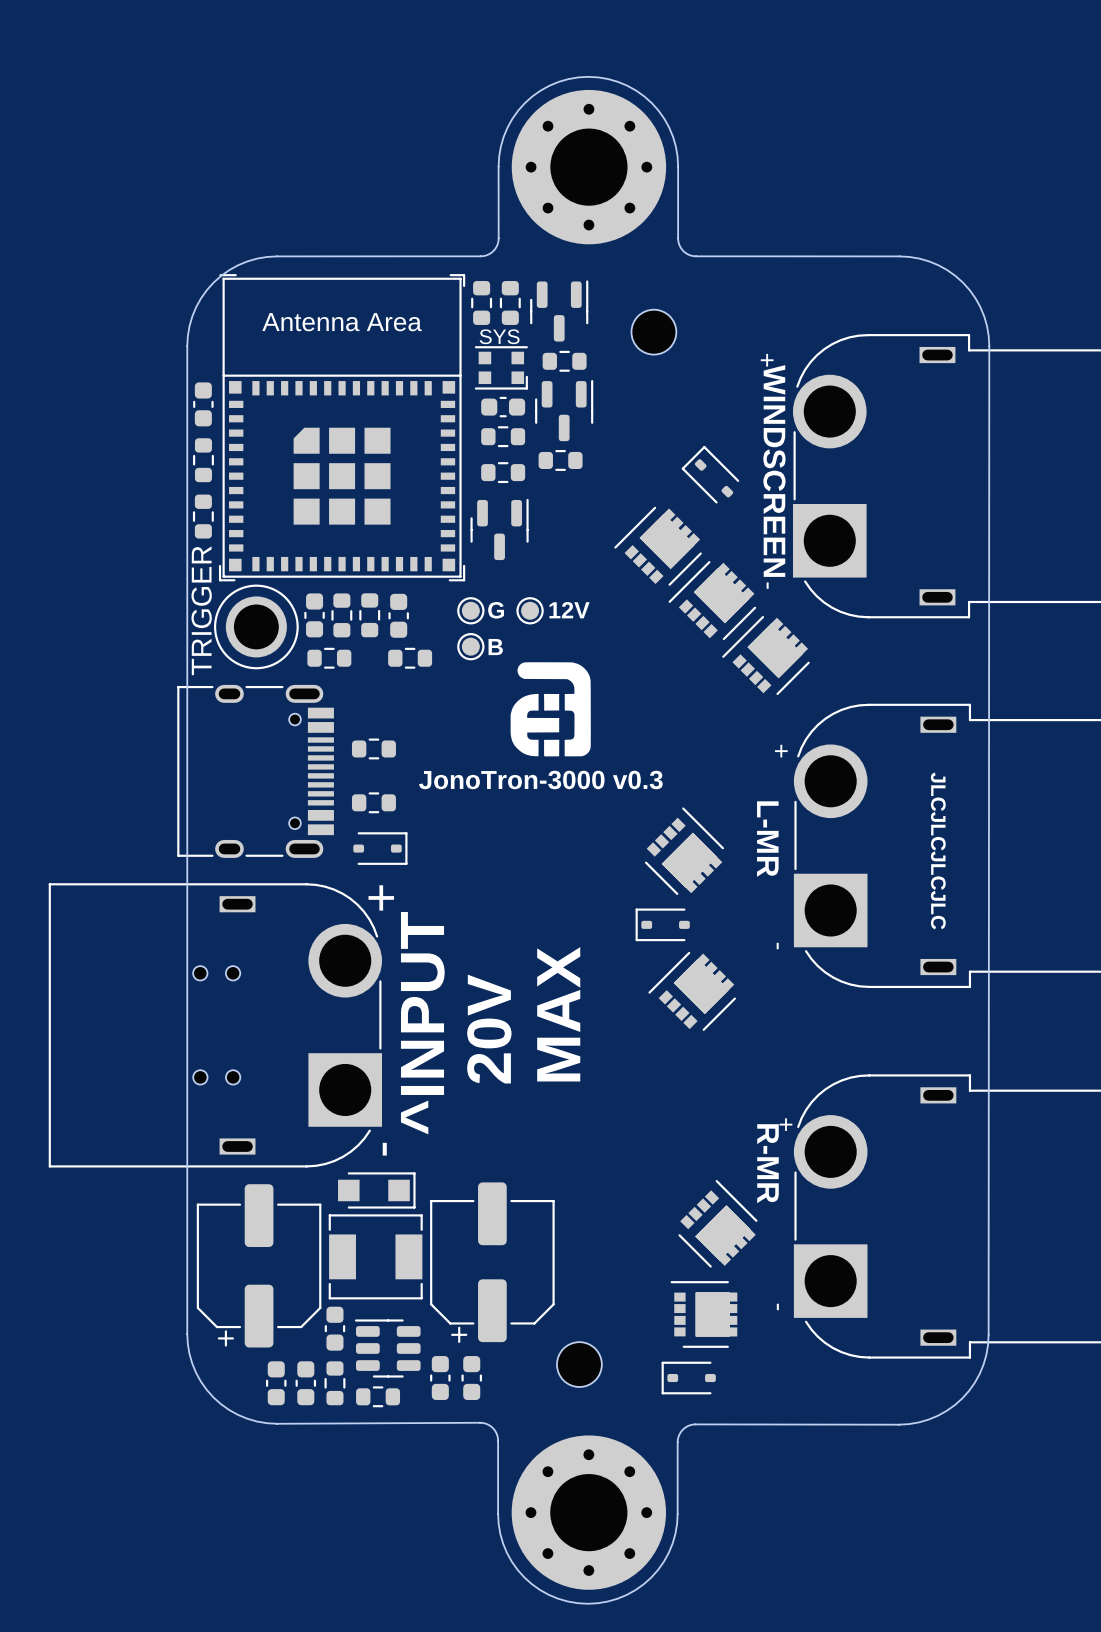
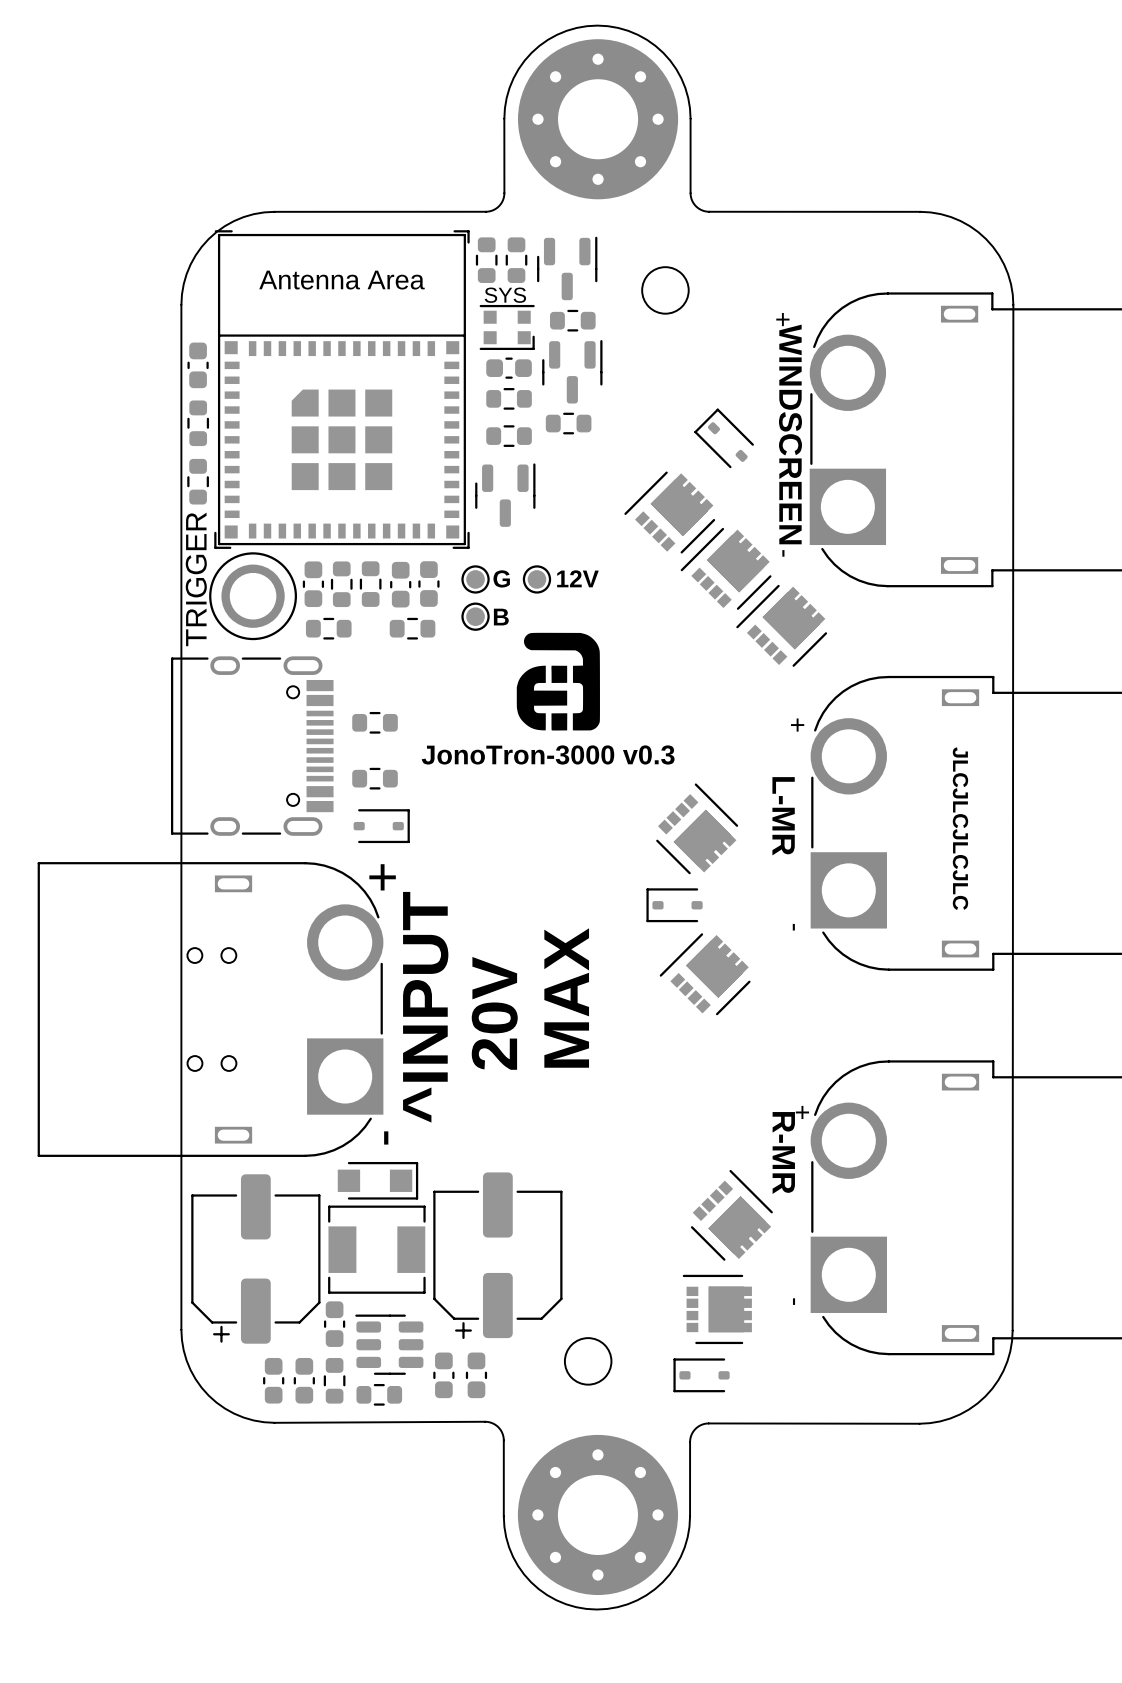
part: none -> (428, 584)

